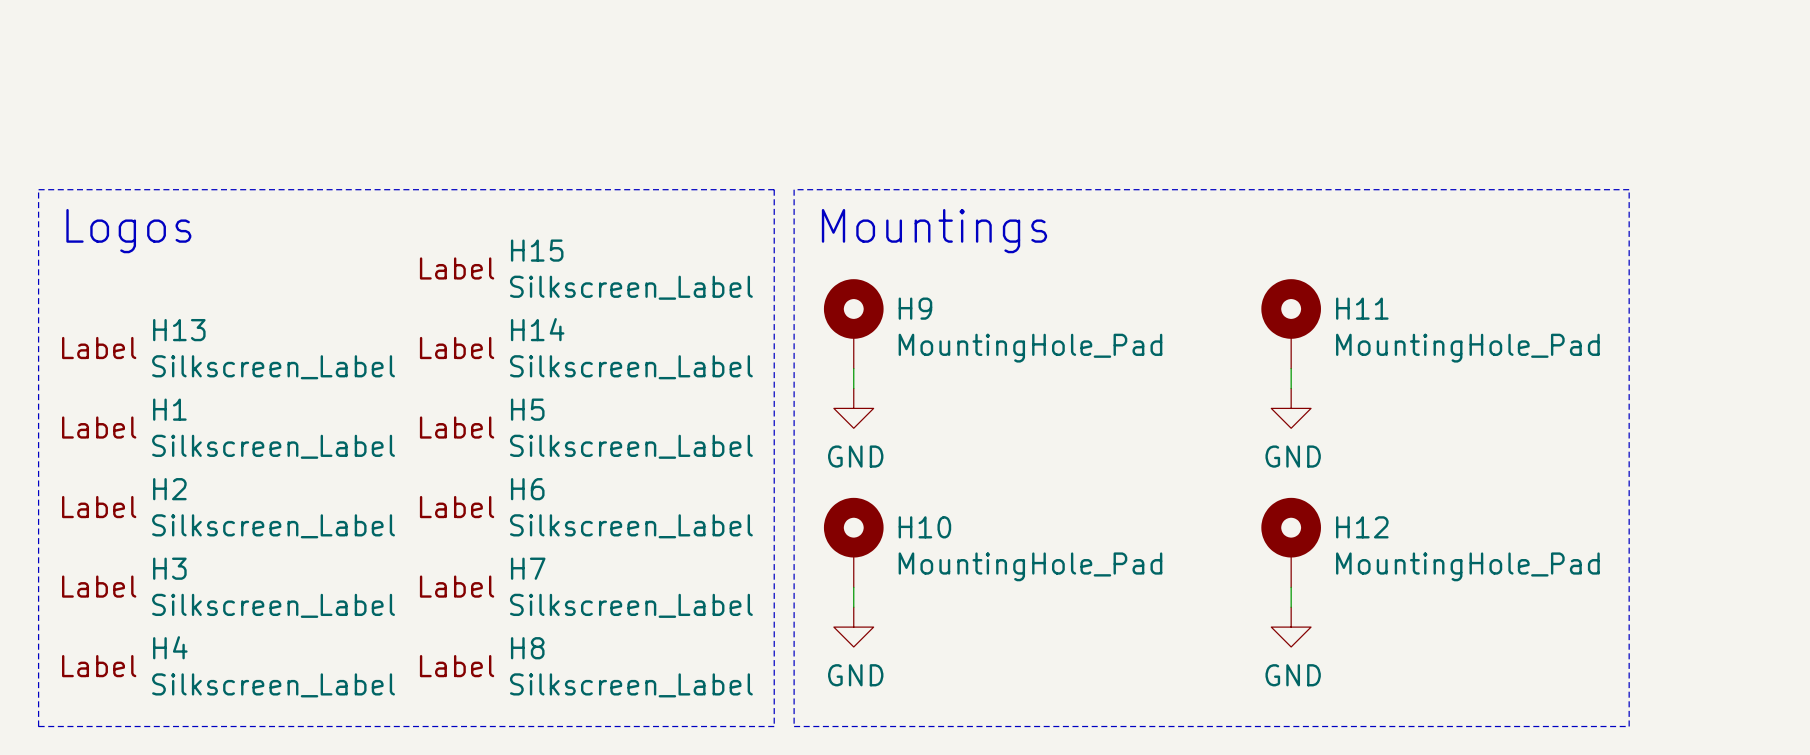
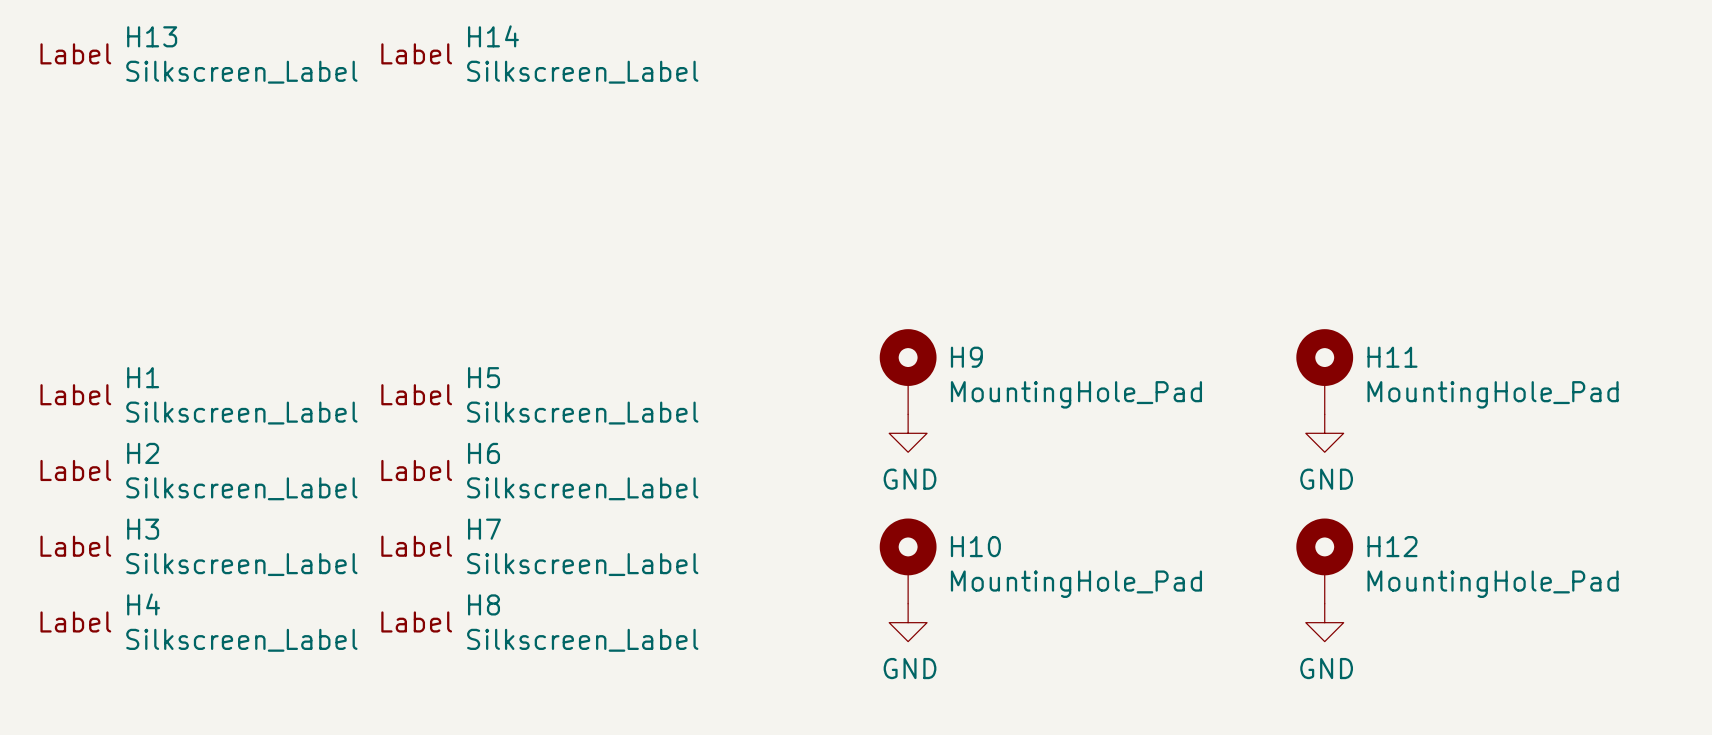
line: (38, 189) (38, 726) (774, 726) (774, 189) (38, 189) -> none
line: (794, 189) (1629, 189) (1629, 726) (794, 726) (794, 189) -> none
text: Logos (128, 231) -> none
text: Mountings (934, 231) -> none
H15: Silkscreen_Label (586, 269) -> none
H9 position: (853, 323) -> (908, 371)
H11 position: (1291, 323) -> (1324, 371)
H14 position: (586, 348) -> (539, 54)
H13 position: (228, 349) -> (198, 54)
wire: (853, 368) (853, 388) -> none
wire: (1291, 368) (1291, 388) -> none
power symbol: GND (853, 408) -> none
power symbol: GND (1291, 408) -> none
power symbol: none -> GND (908, 433)
power symbol: none -> GND (1324, 433)
H10 position: (853, 542) -> (908, 561)
H12 position: (1291, 542) -> (1324, 561)
wire: (853, 587) (853, 607) -> none
wire: (1291, 587) (1291, 607) -> none
power symbol: GND (853, 627) -> none
power symbol: GND (1291, 627) -> none
power symbol: none -> GND (908, 622)
power symbol: none -> GND (1324, 622)

